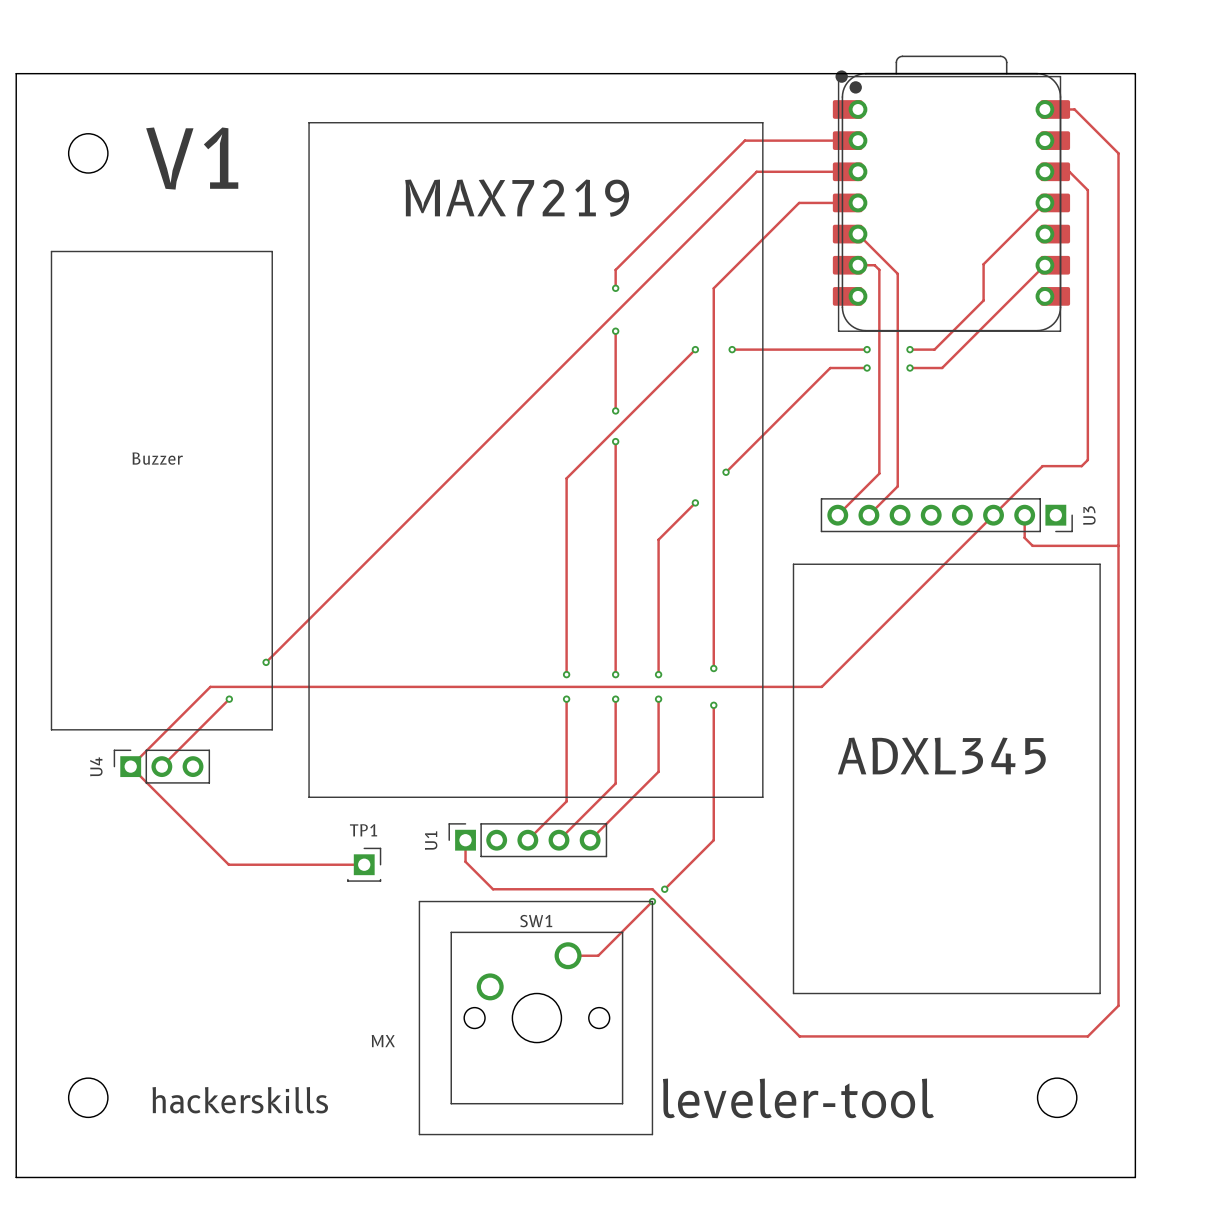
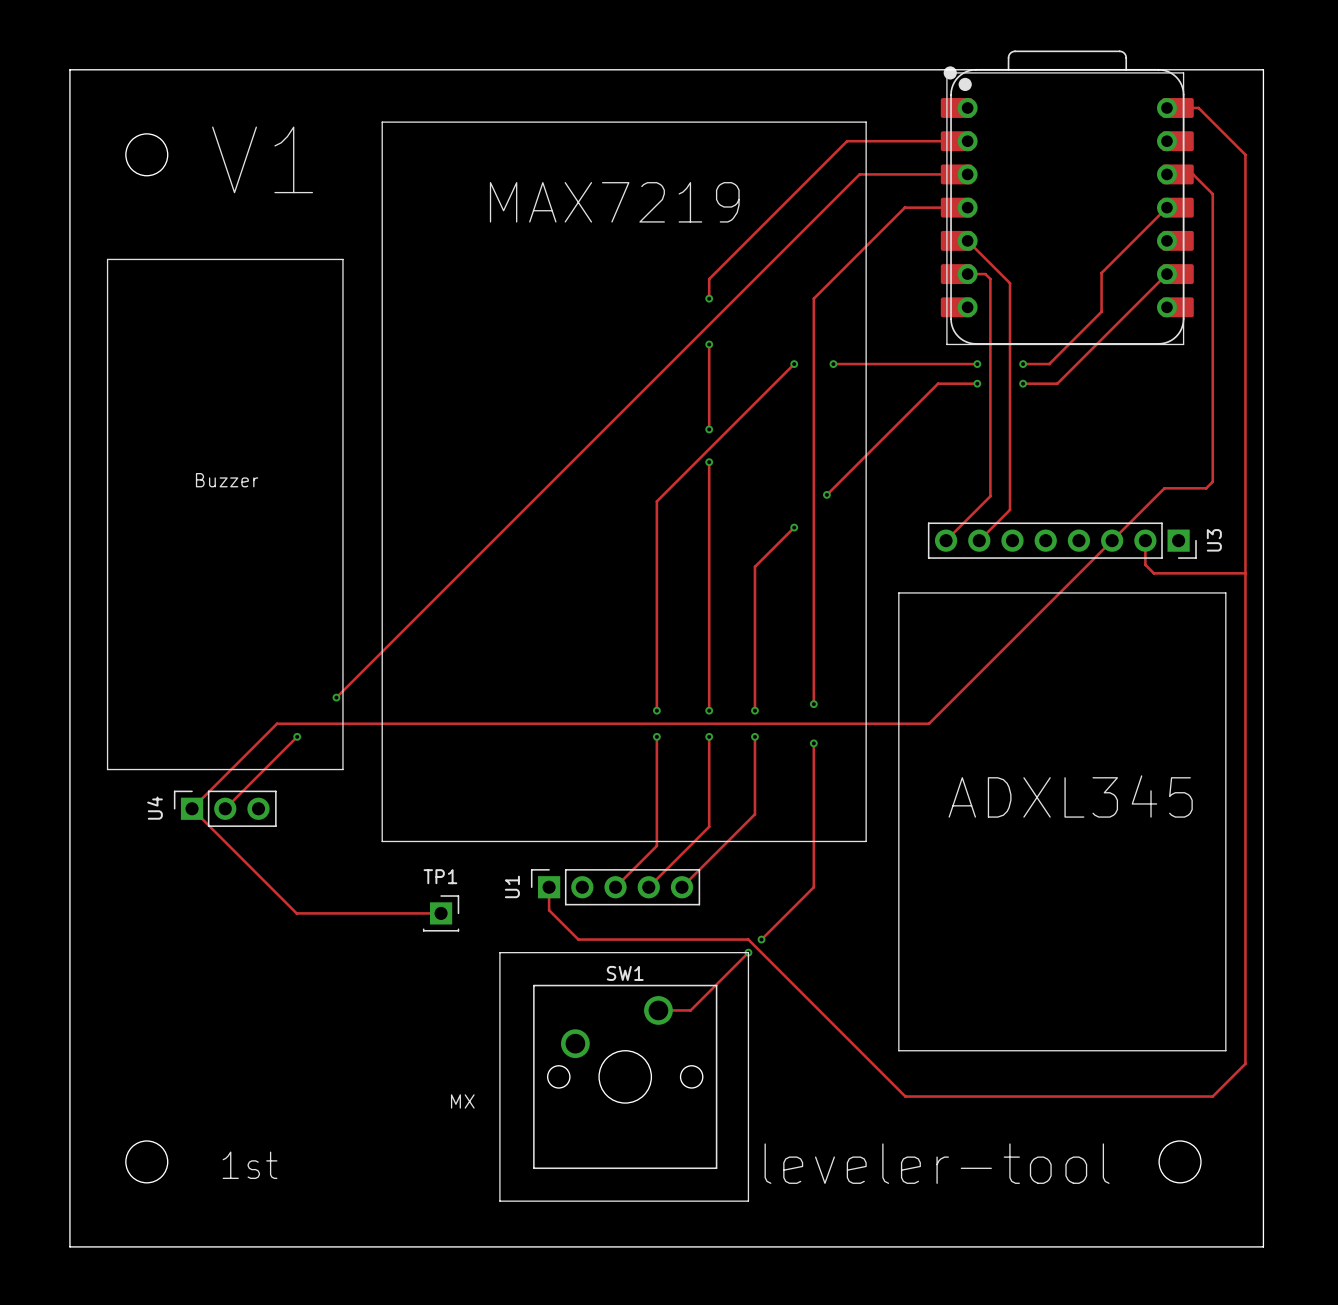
text: hackerskills (240, 1100) -> 1st (250, 1165)

